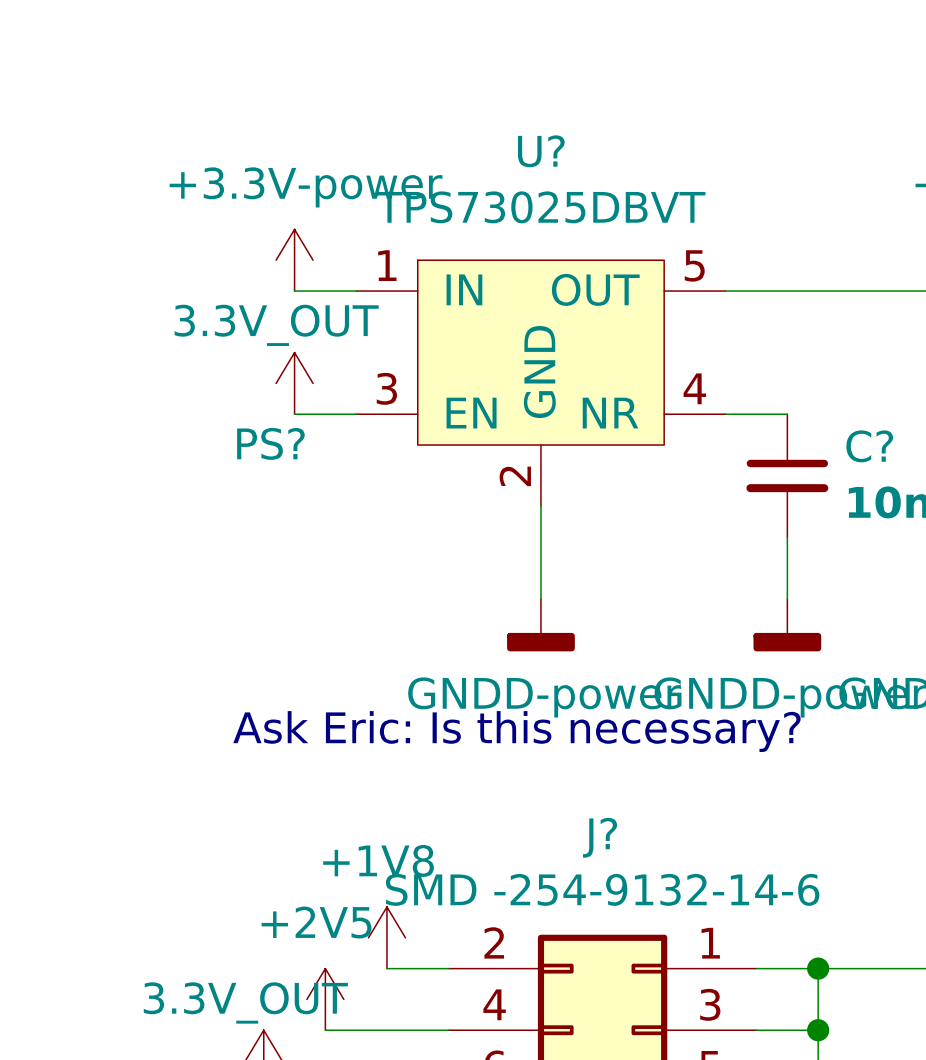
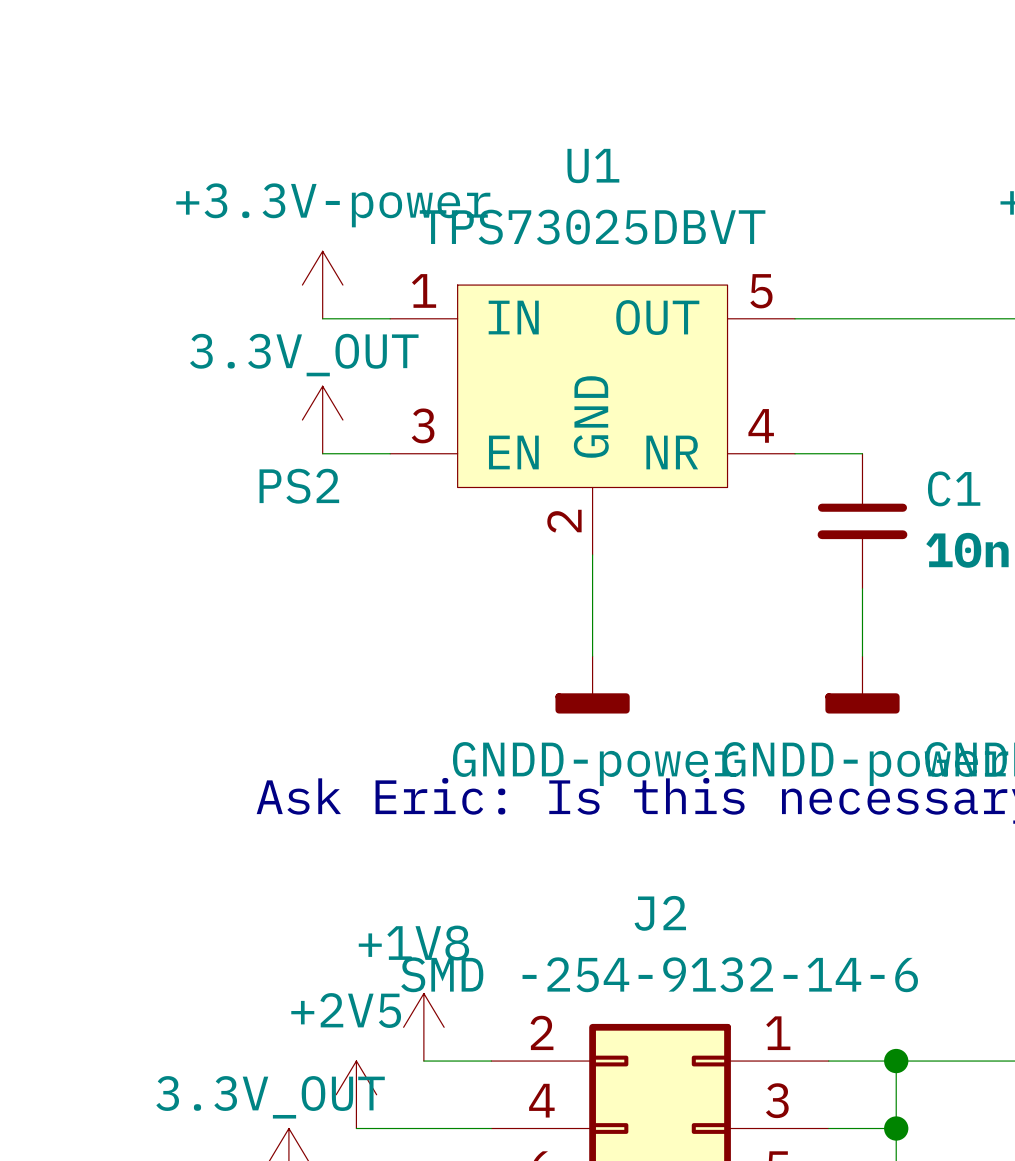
U? name: U? (541, 151) -> U1 (593, 166)
PS? name: PS? (270, 443) -> PS2 (299, 486)
C? name: C? (869, 446) -> C1 (954, 488)
J? name: J? (600, 837) -> J2 (660, 913)

